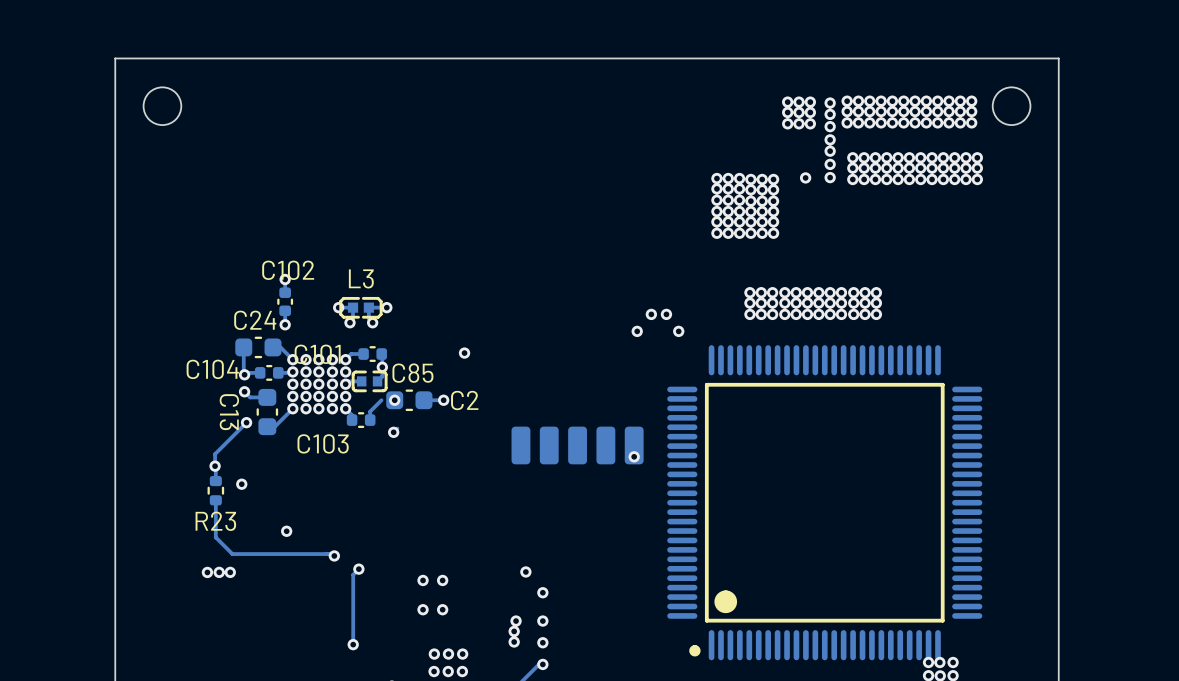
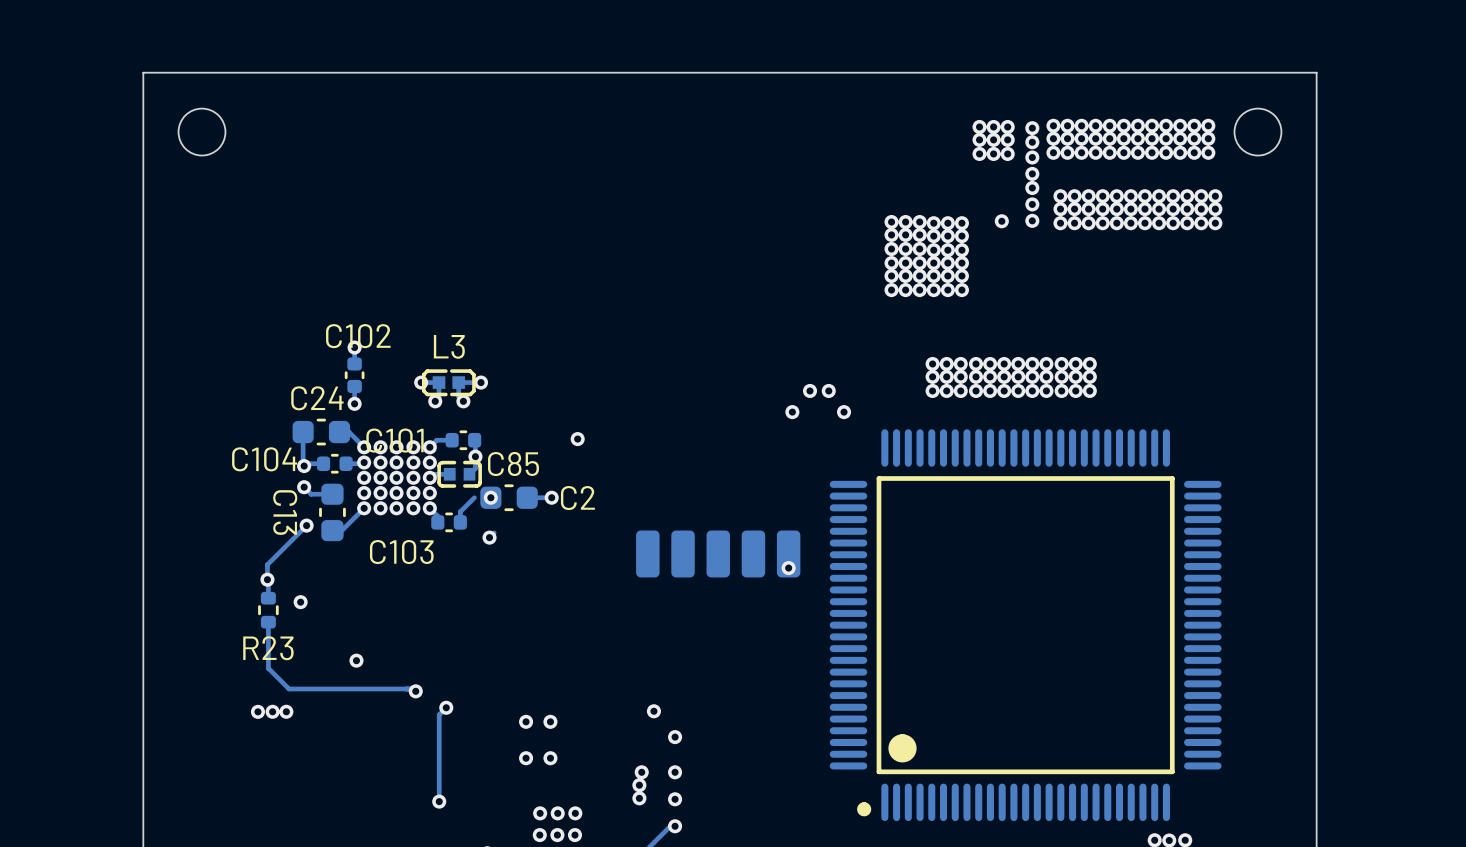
via: (928, 662) -> none
via: (939, 662) -> none
via: (953, 662) -> none

